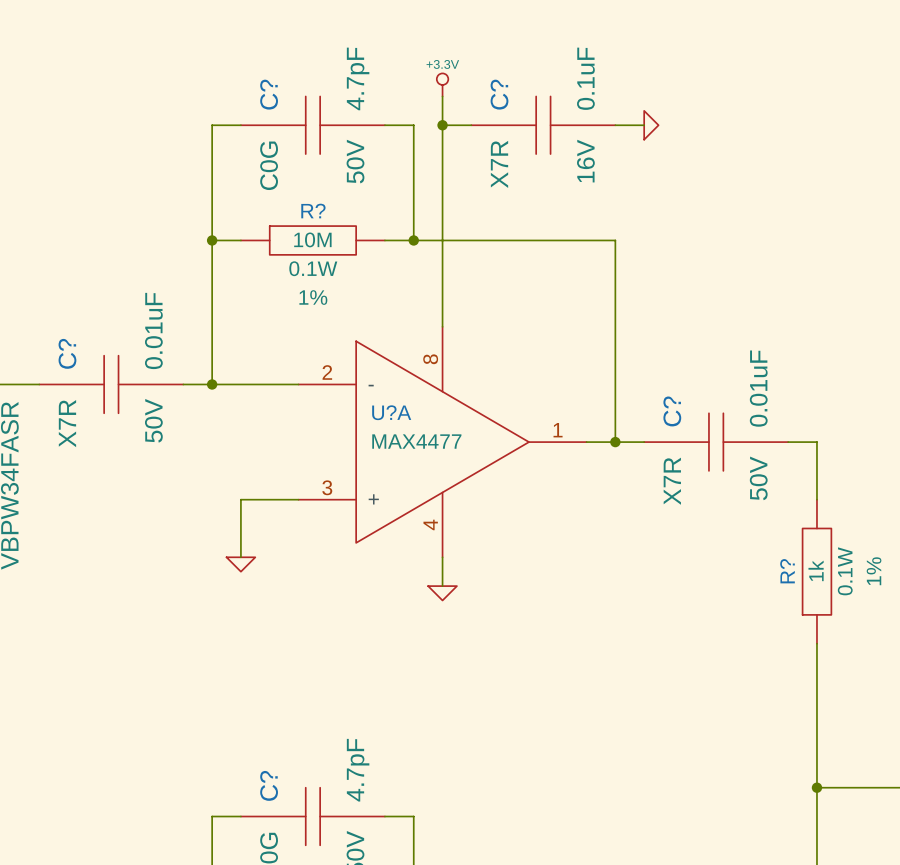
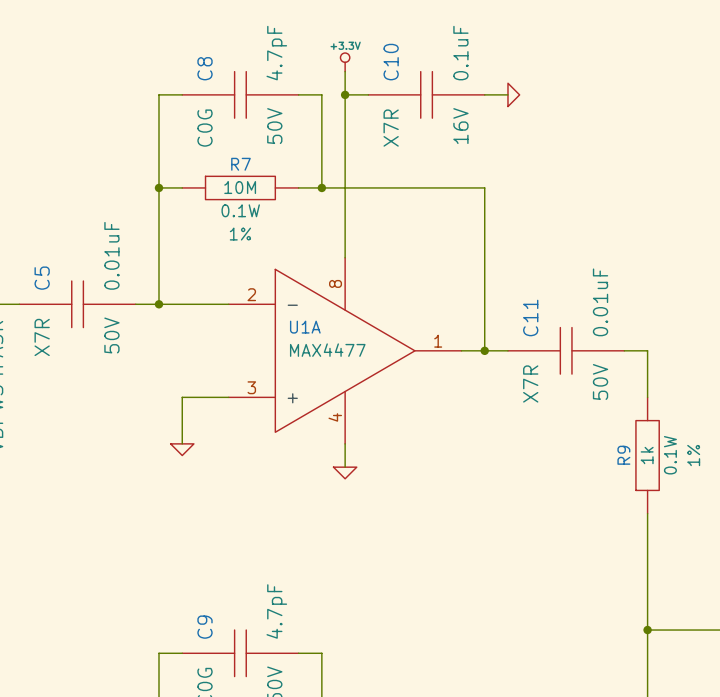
C? name: C? (269, 94) -> C8 (205, 68)
C? name: C? (499, 94) -> C10 (391, 62)
R? name: R? (313, 211) -> R7 (240, 164)
C? name: C? (67, 353) -> C5 (42, 278)
C? name: C? (672, 411) -> C11 (530, 318)
U?A name: U?A (391, 412) -> U1A (305, 327)
R? name: R? (787, 571) -> R9 (623, 455)
C? name: C? (269, 785) -> C9 (205, 627)

